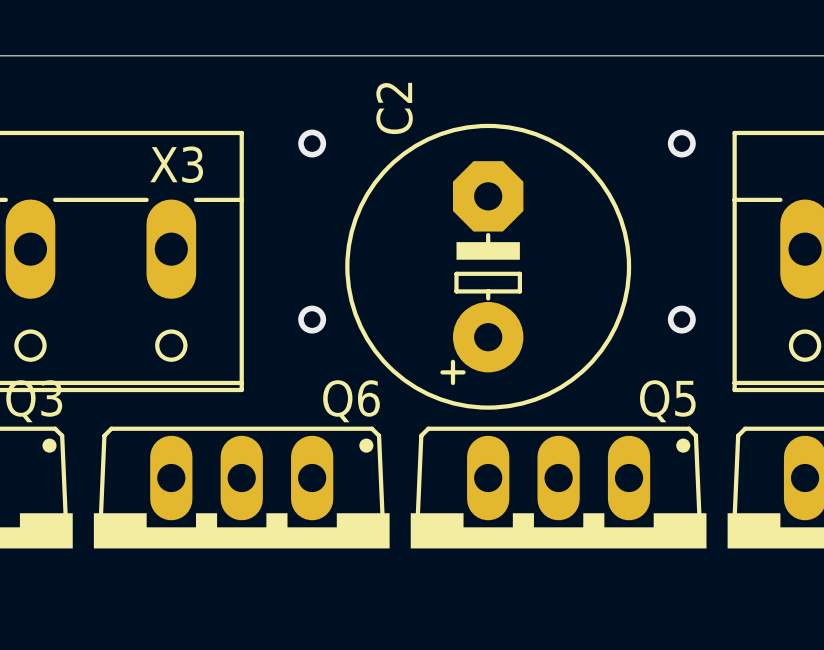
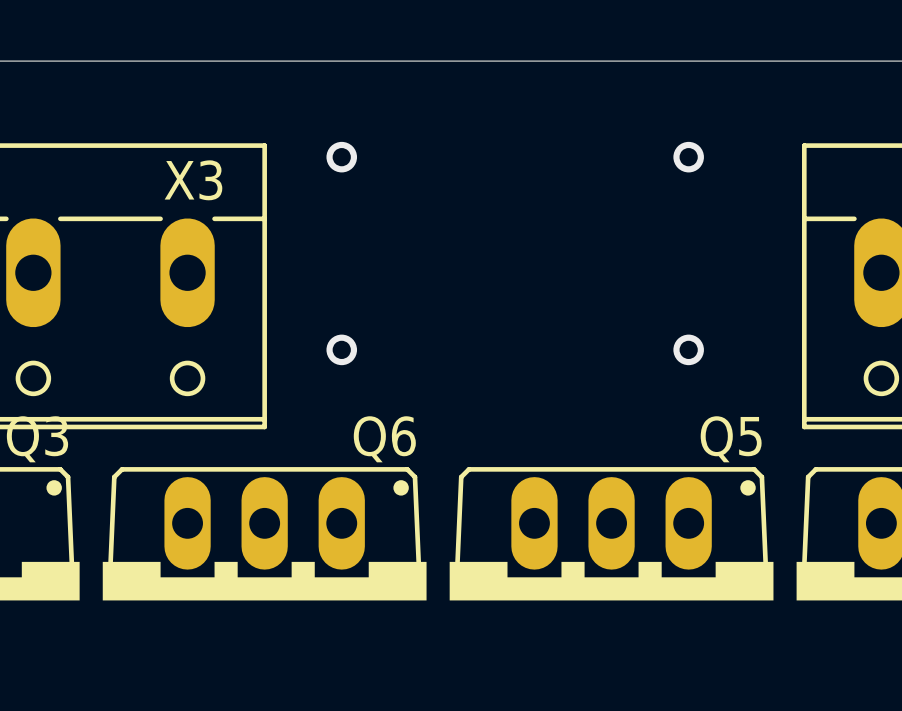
via position: (681, 143) -> (688, 157)
C2: (488, 266) -> none
via position: (681, 319) -> (688, 349)

